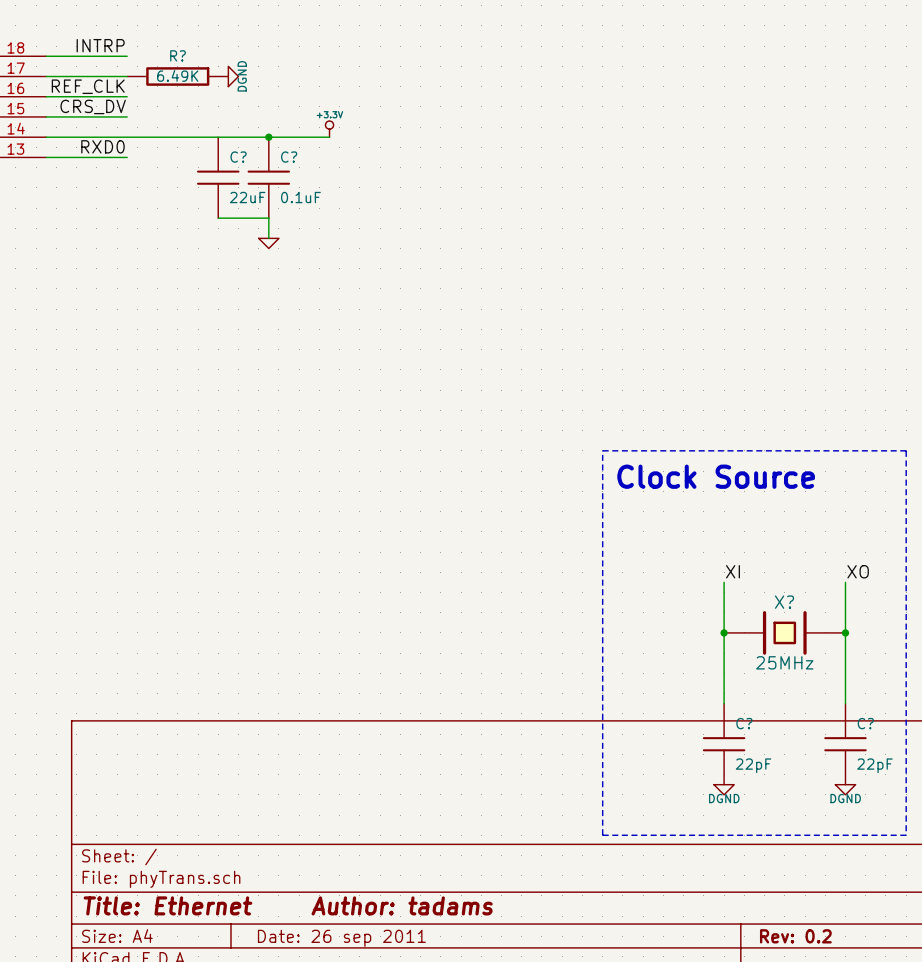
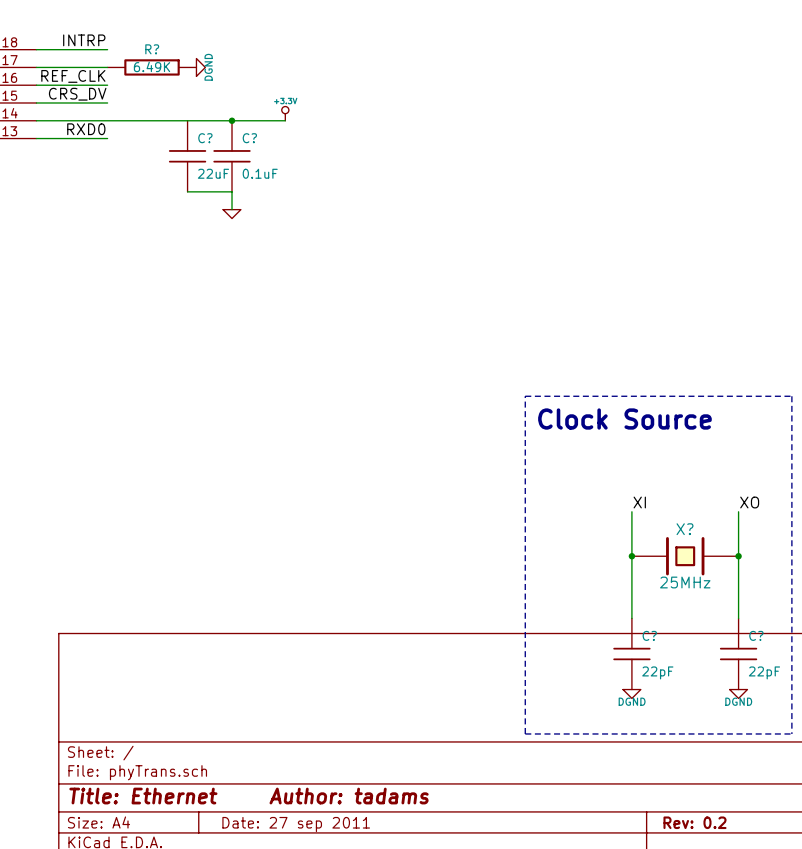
title block: Date: 26 sep 2011 (341, 938) -> Date: 27 sep 2011 (296, 824)

